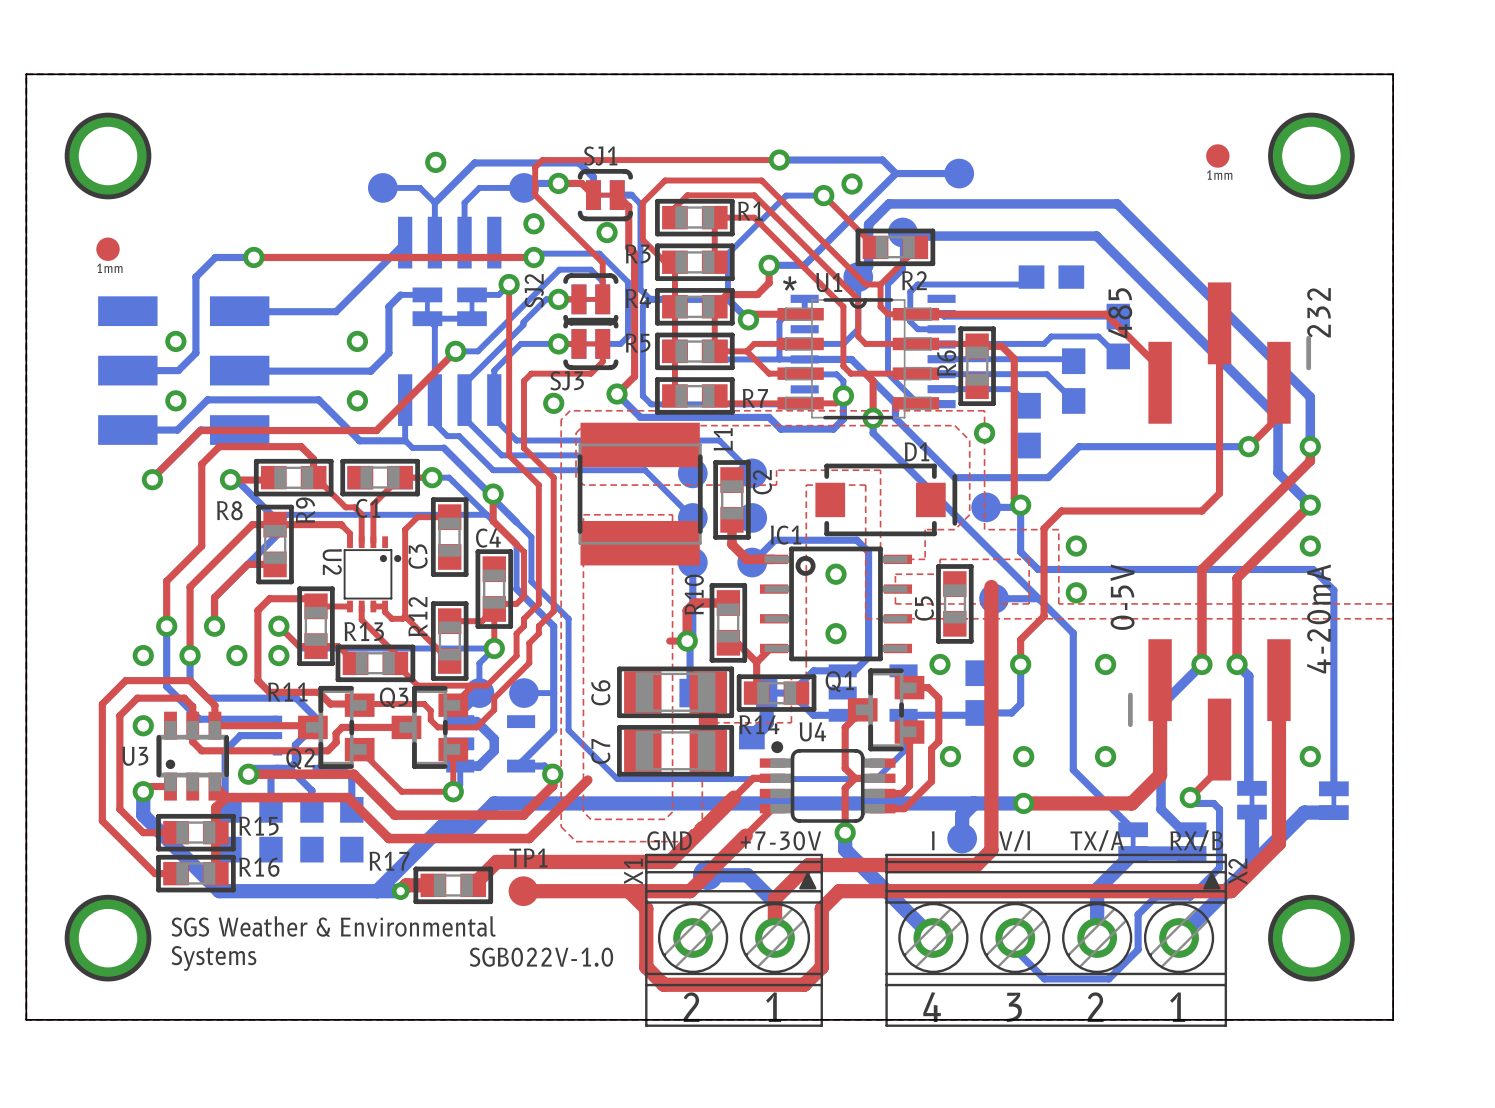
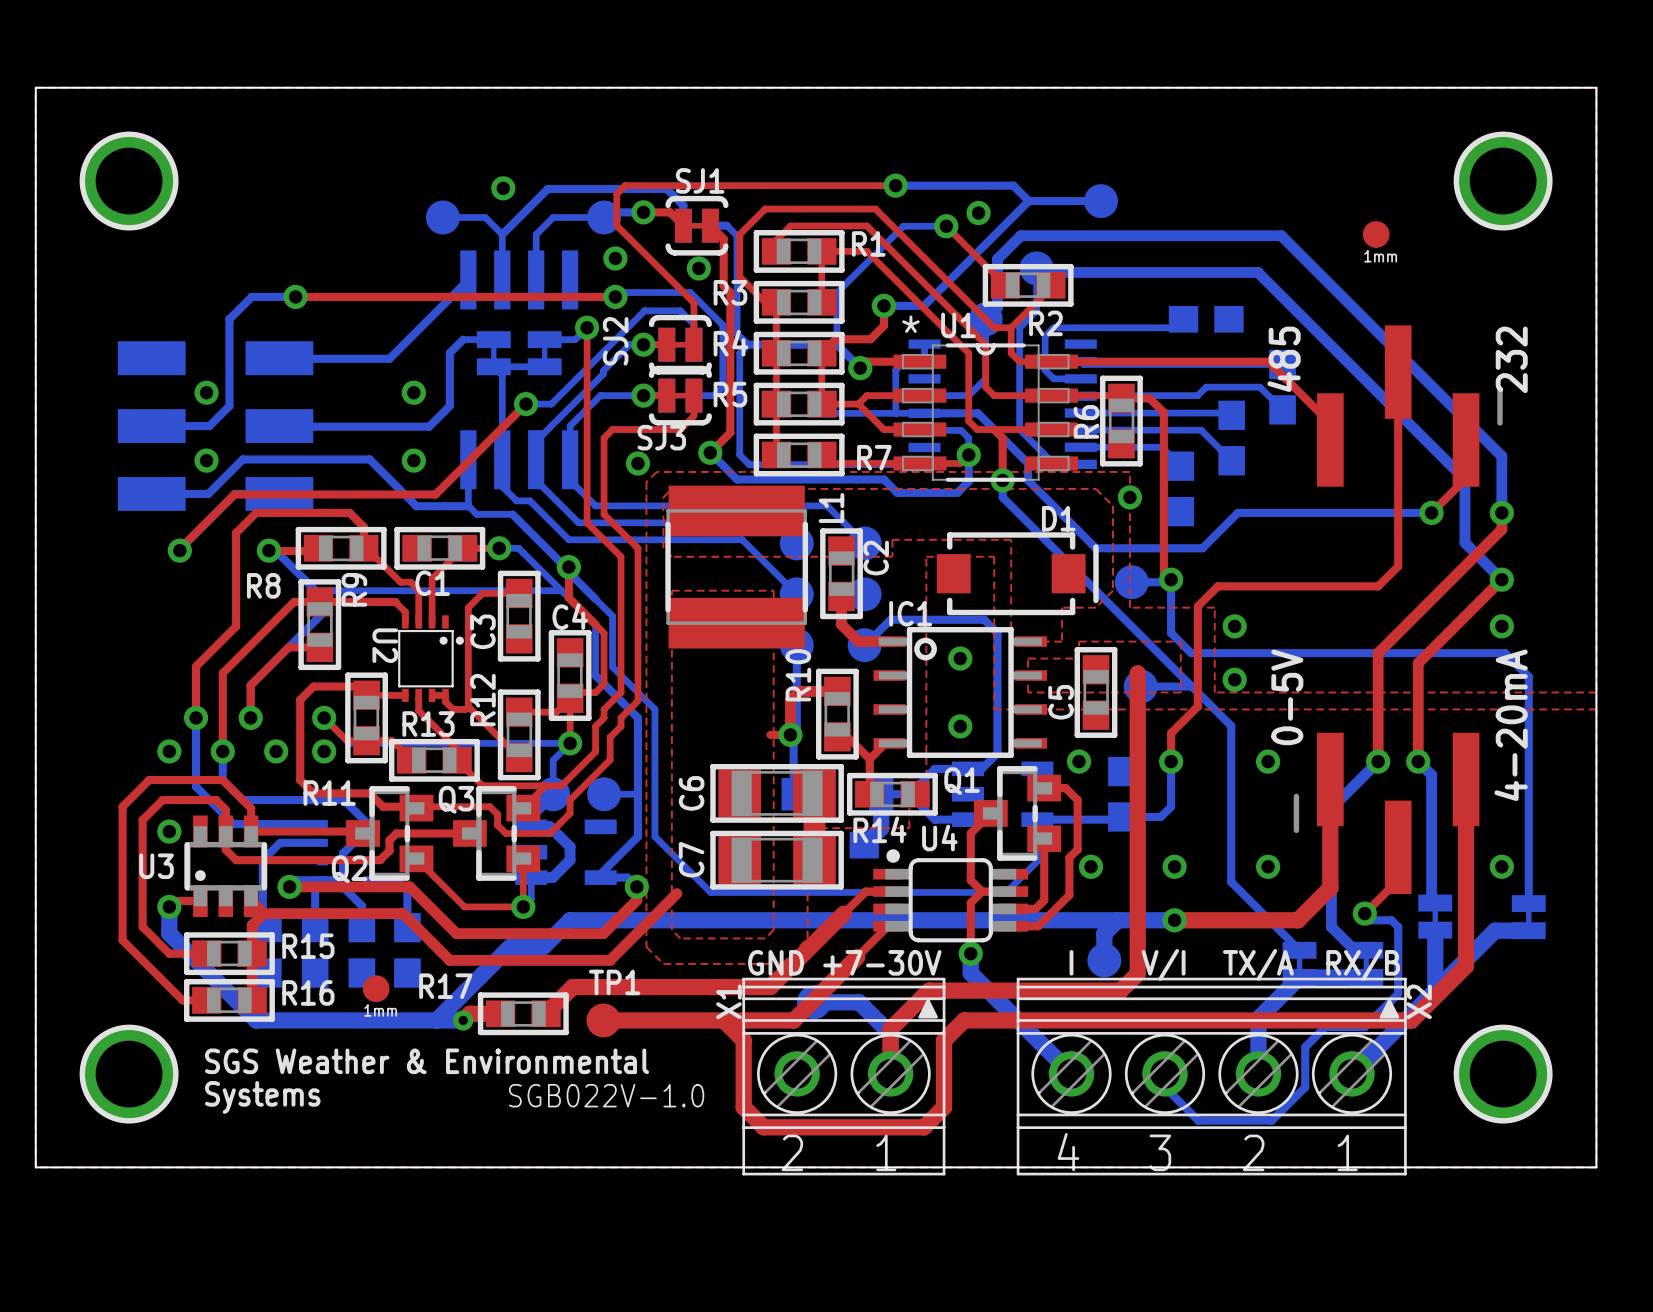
part position: (1217, 156) -> (1376, 234)
part: (108, 249) -> none
part: none -> (376, 988)

